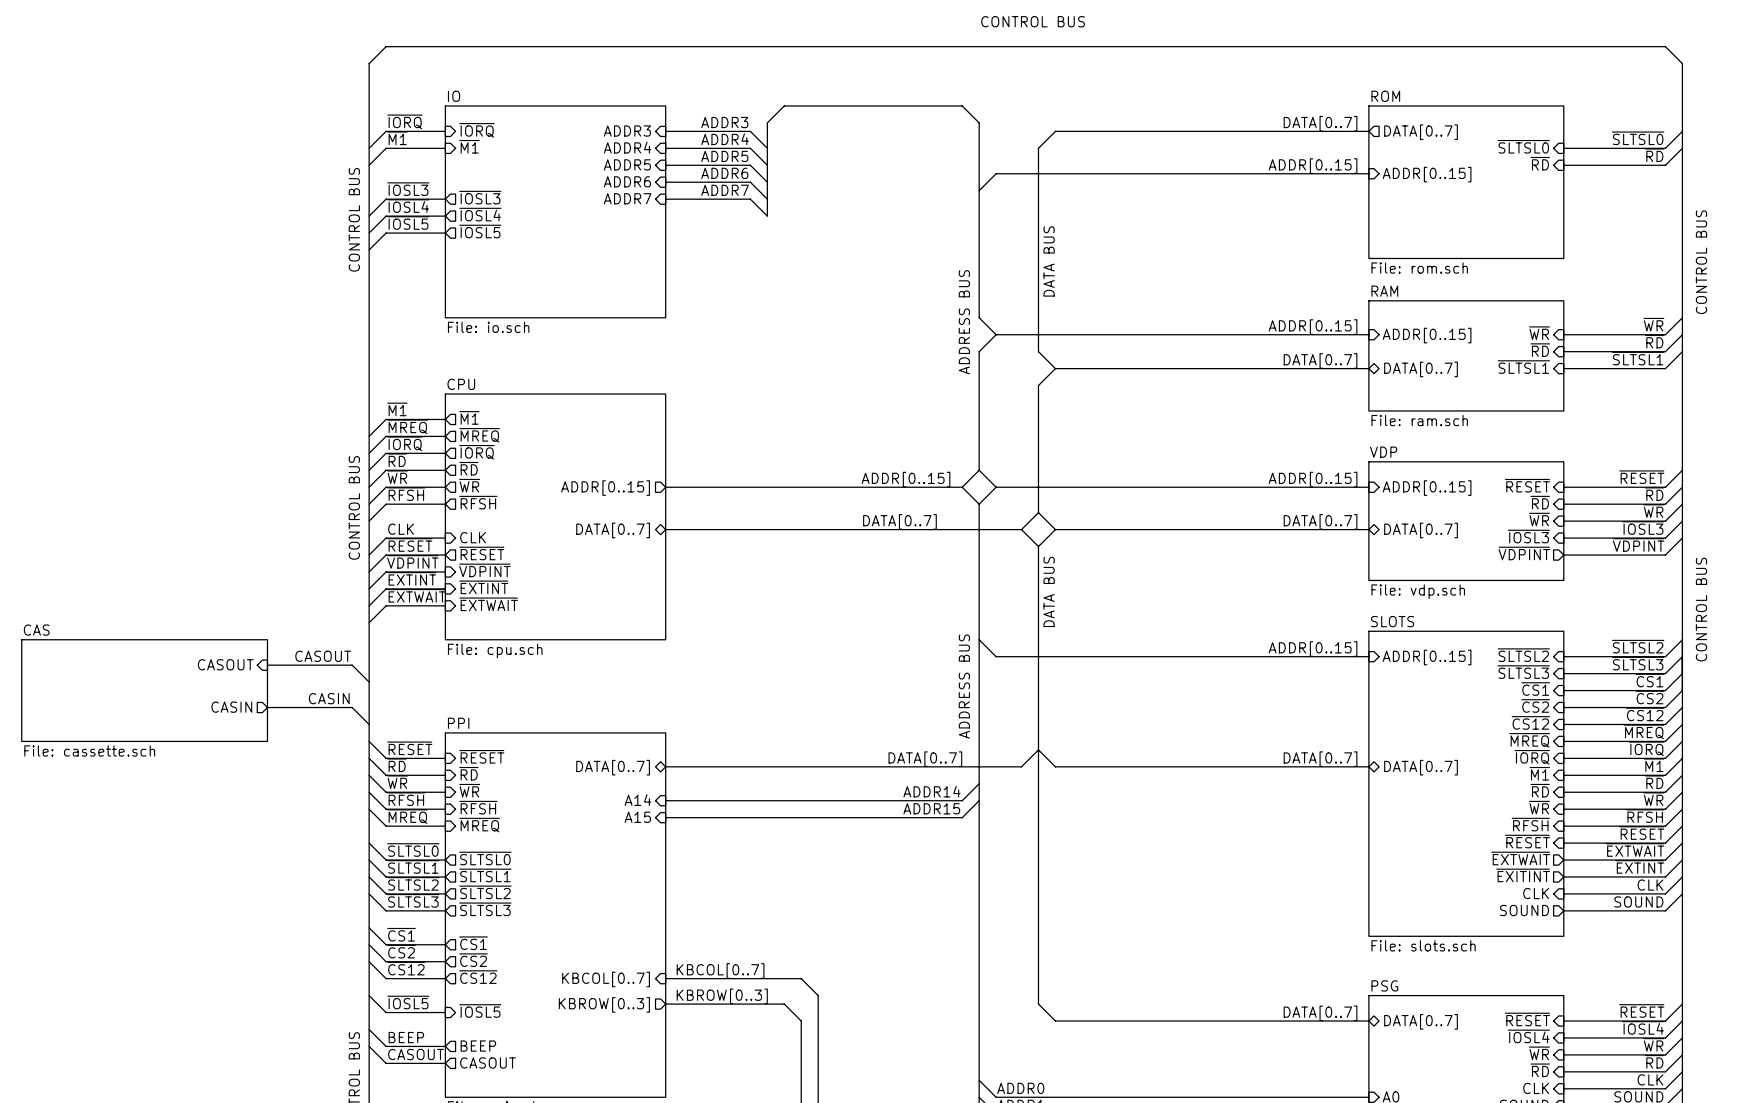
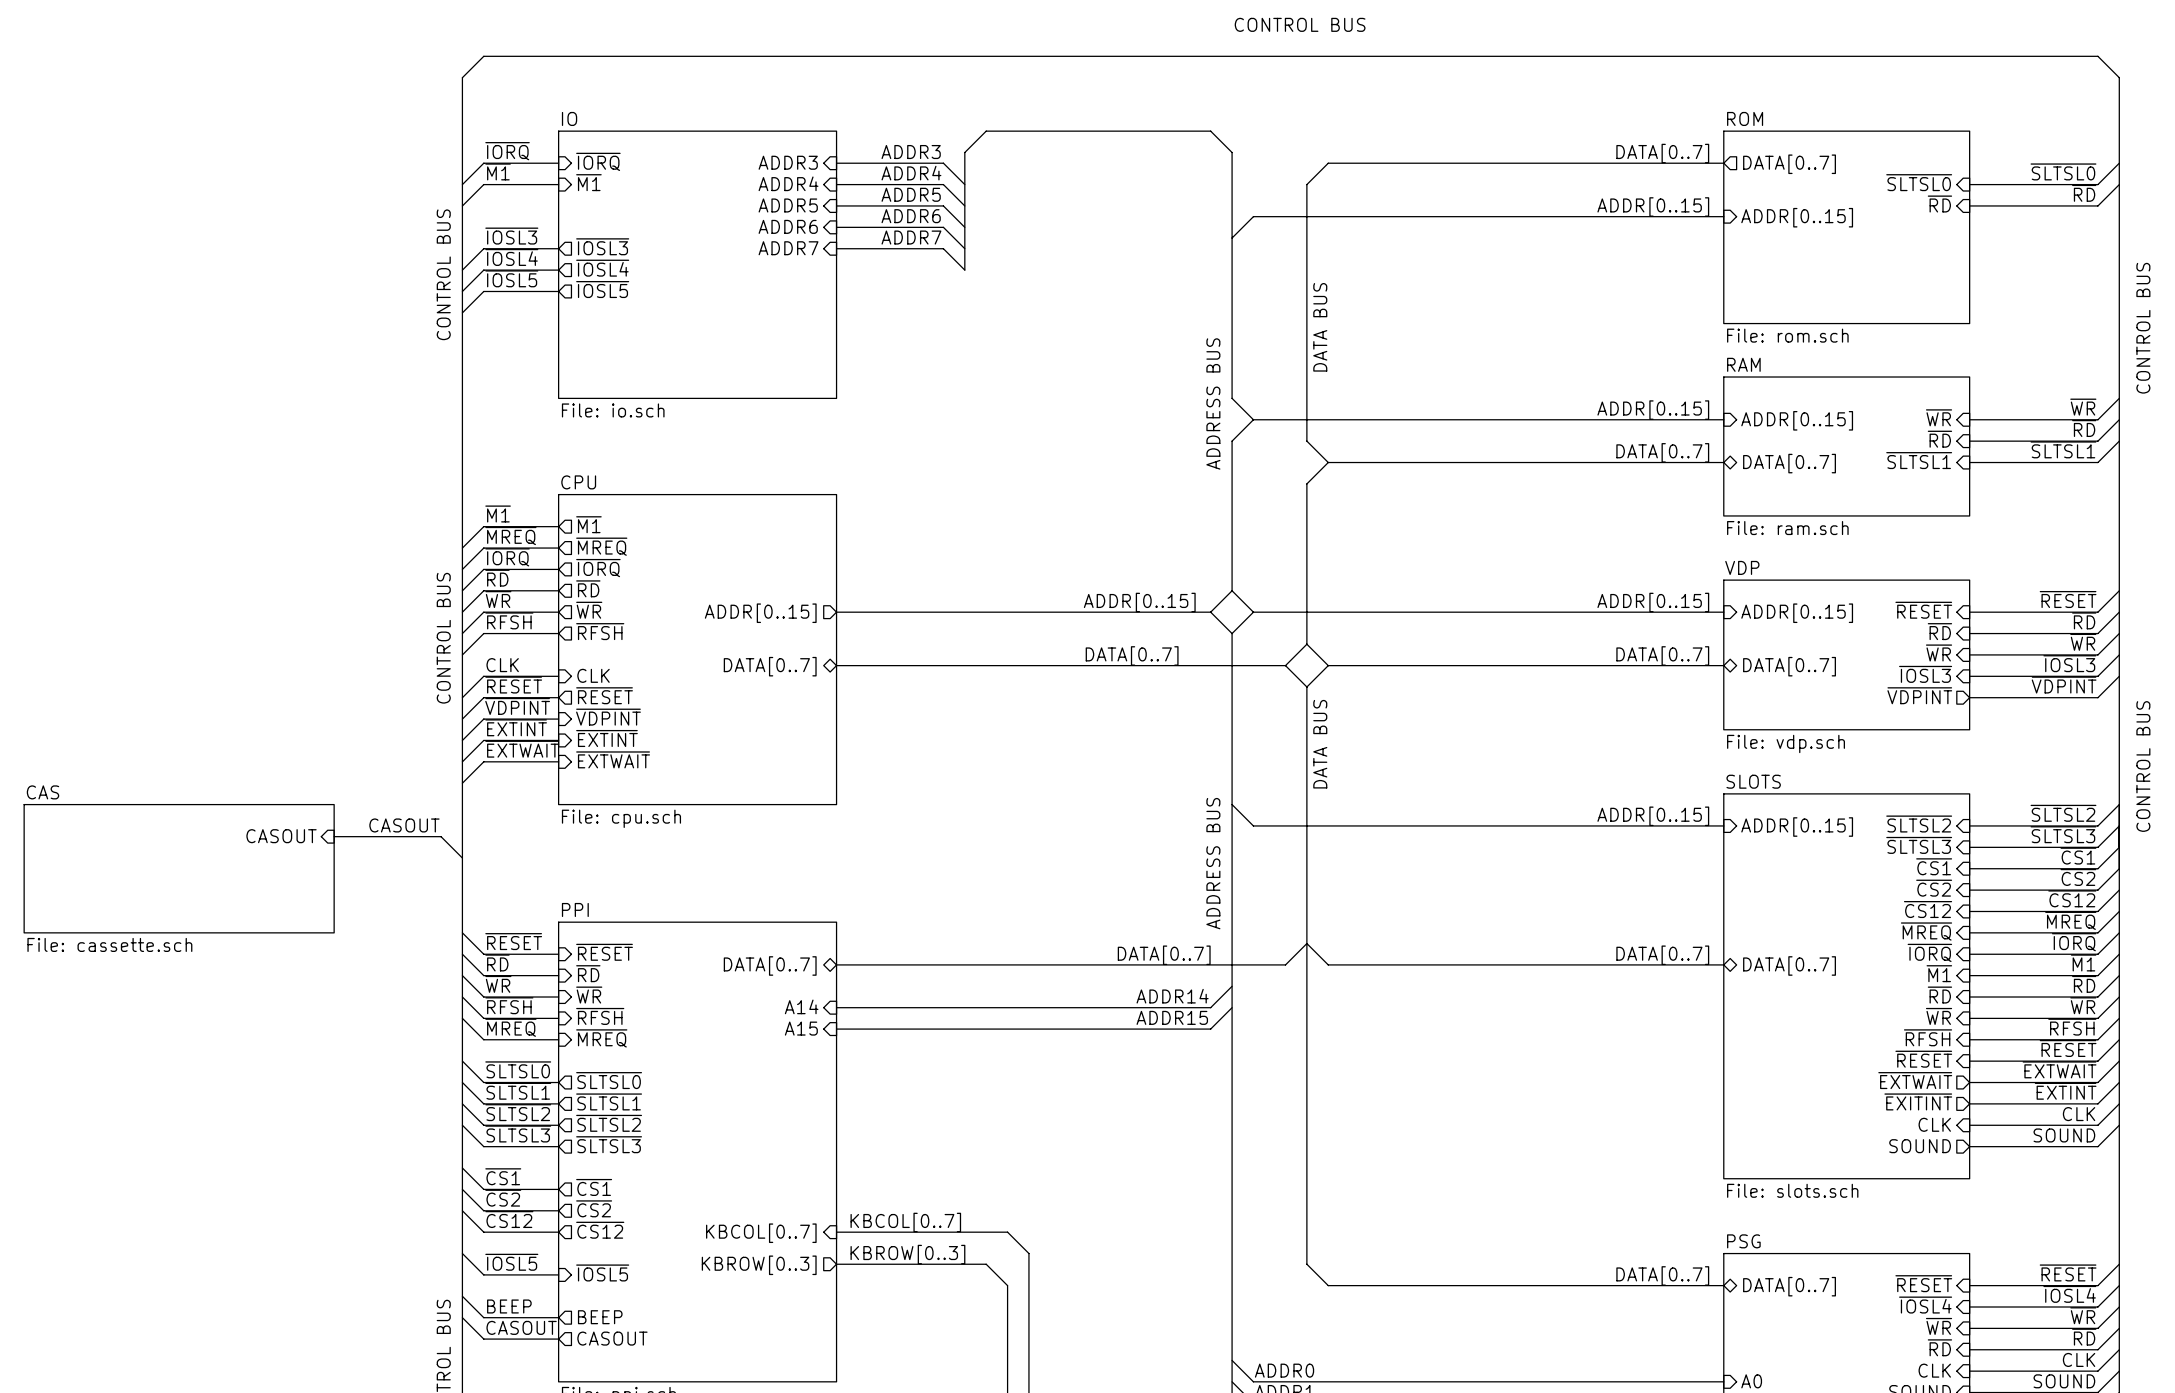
label: CASIN (329, 698) -> none
sheet pin: CASIN (231, 707) -> none
wire: (267, 707) (352, 707) (369, 724) -> none

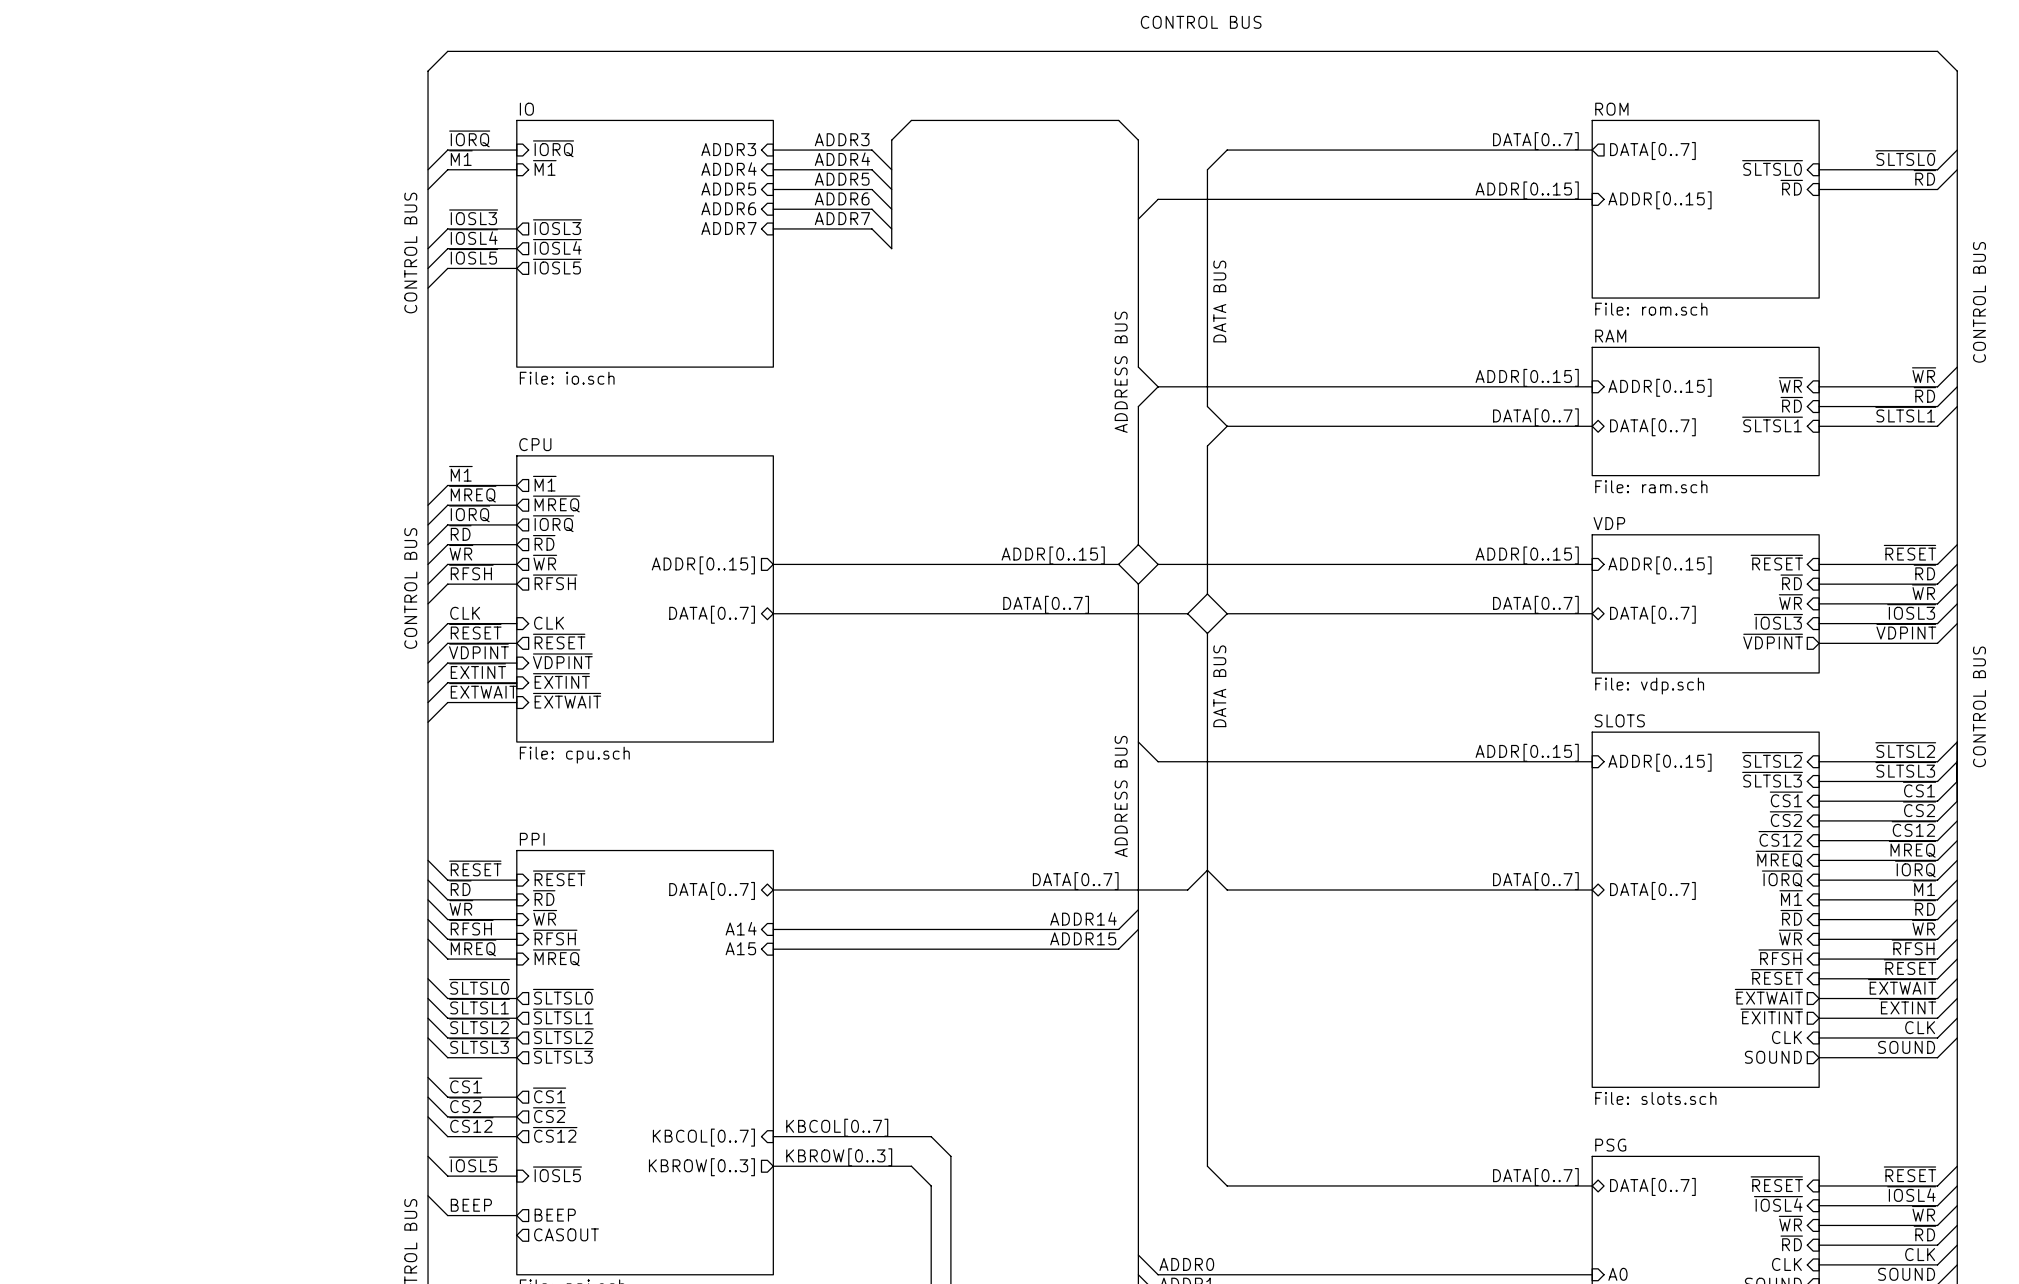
label: CASOUT (404, 825) -> none
sheet pin: CASOUT (281, 836) -> none
wire: (334, 836) (441, 836) (462, 858) -> none
sheet CAS: File: cassette.sch (179, 868) -> none
wire: (462, 1317) (483, 1339) (558, 1339) -> none
label: CASOUT (521, 1327) -> none

